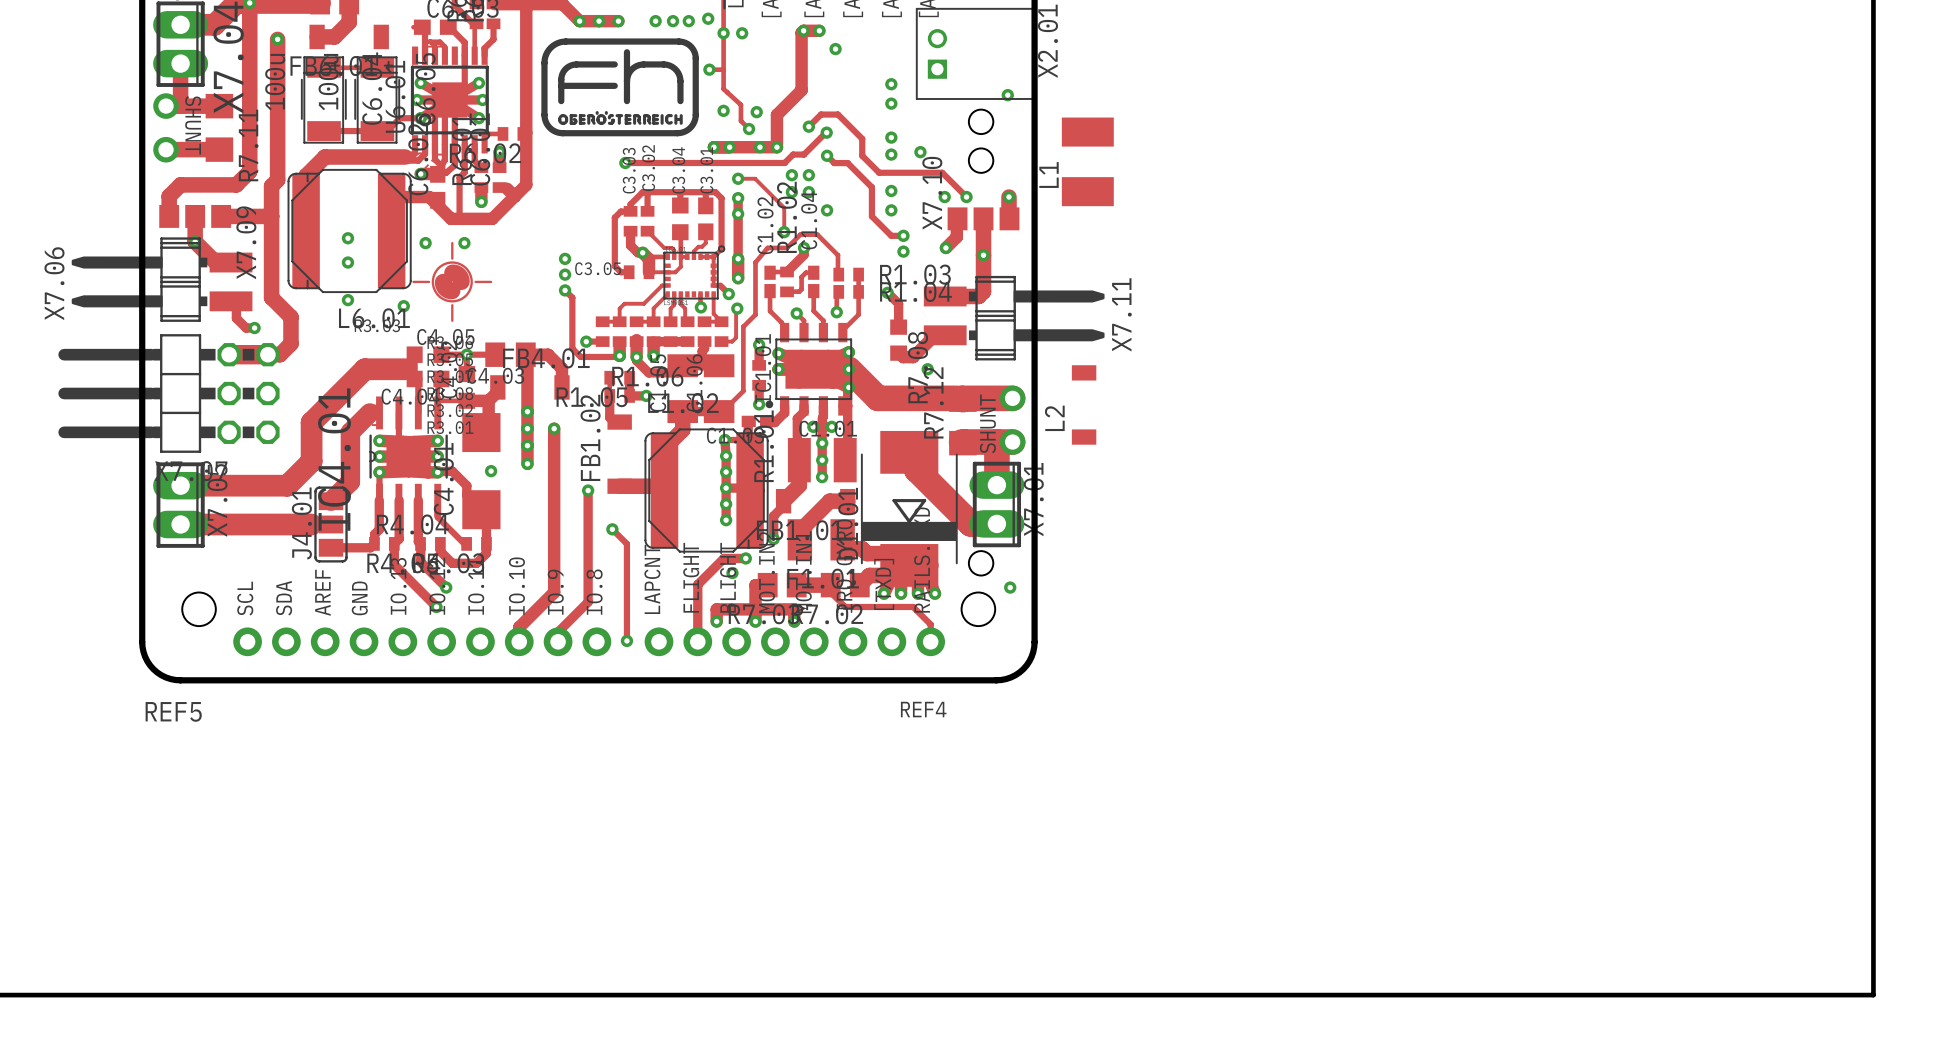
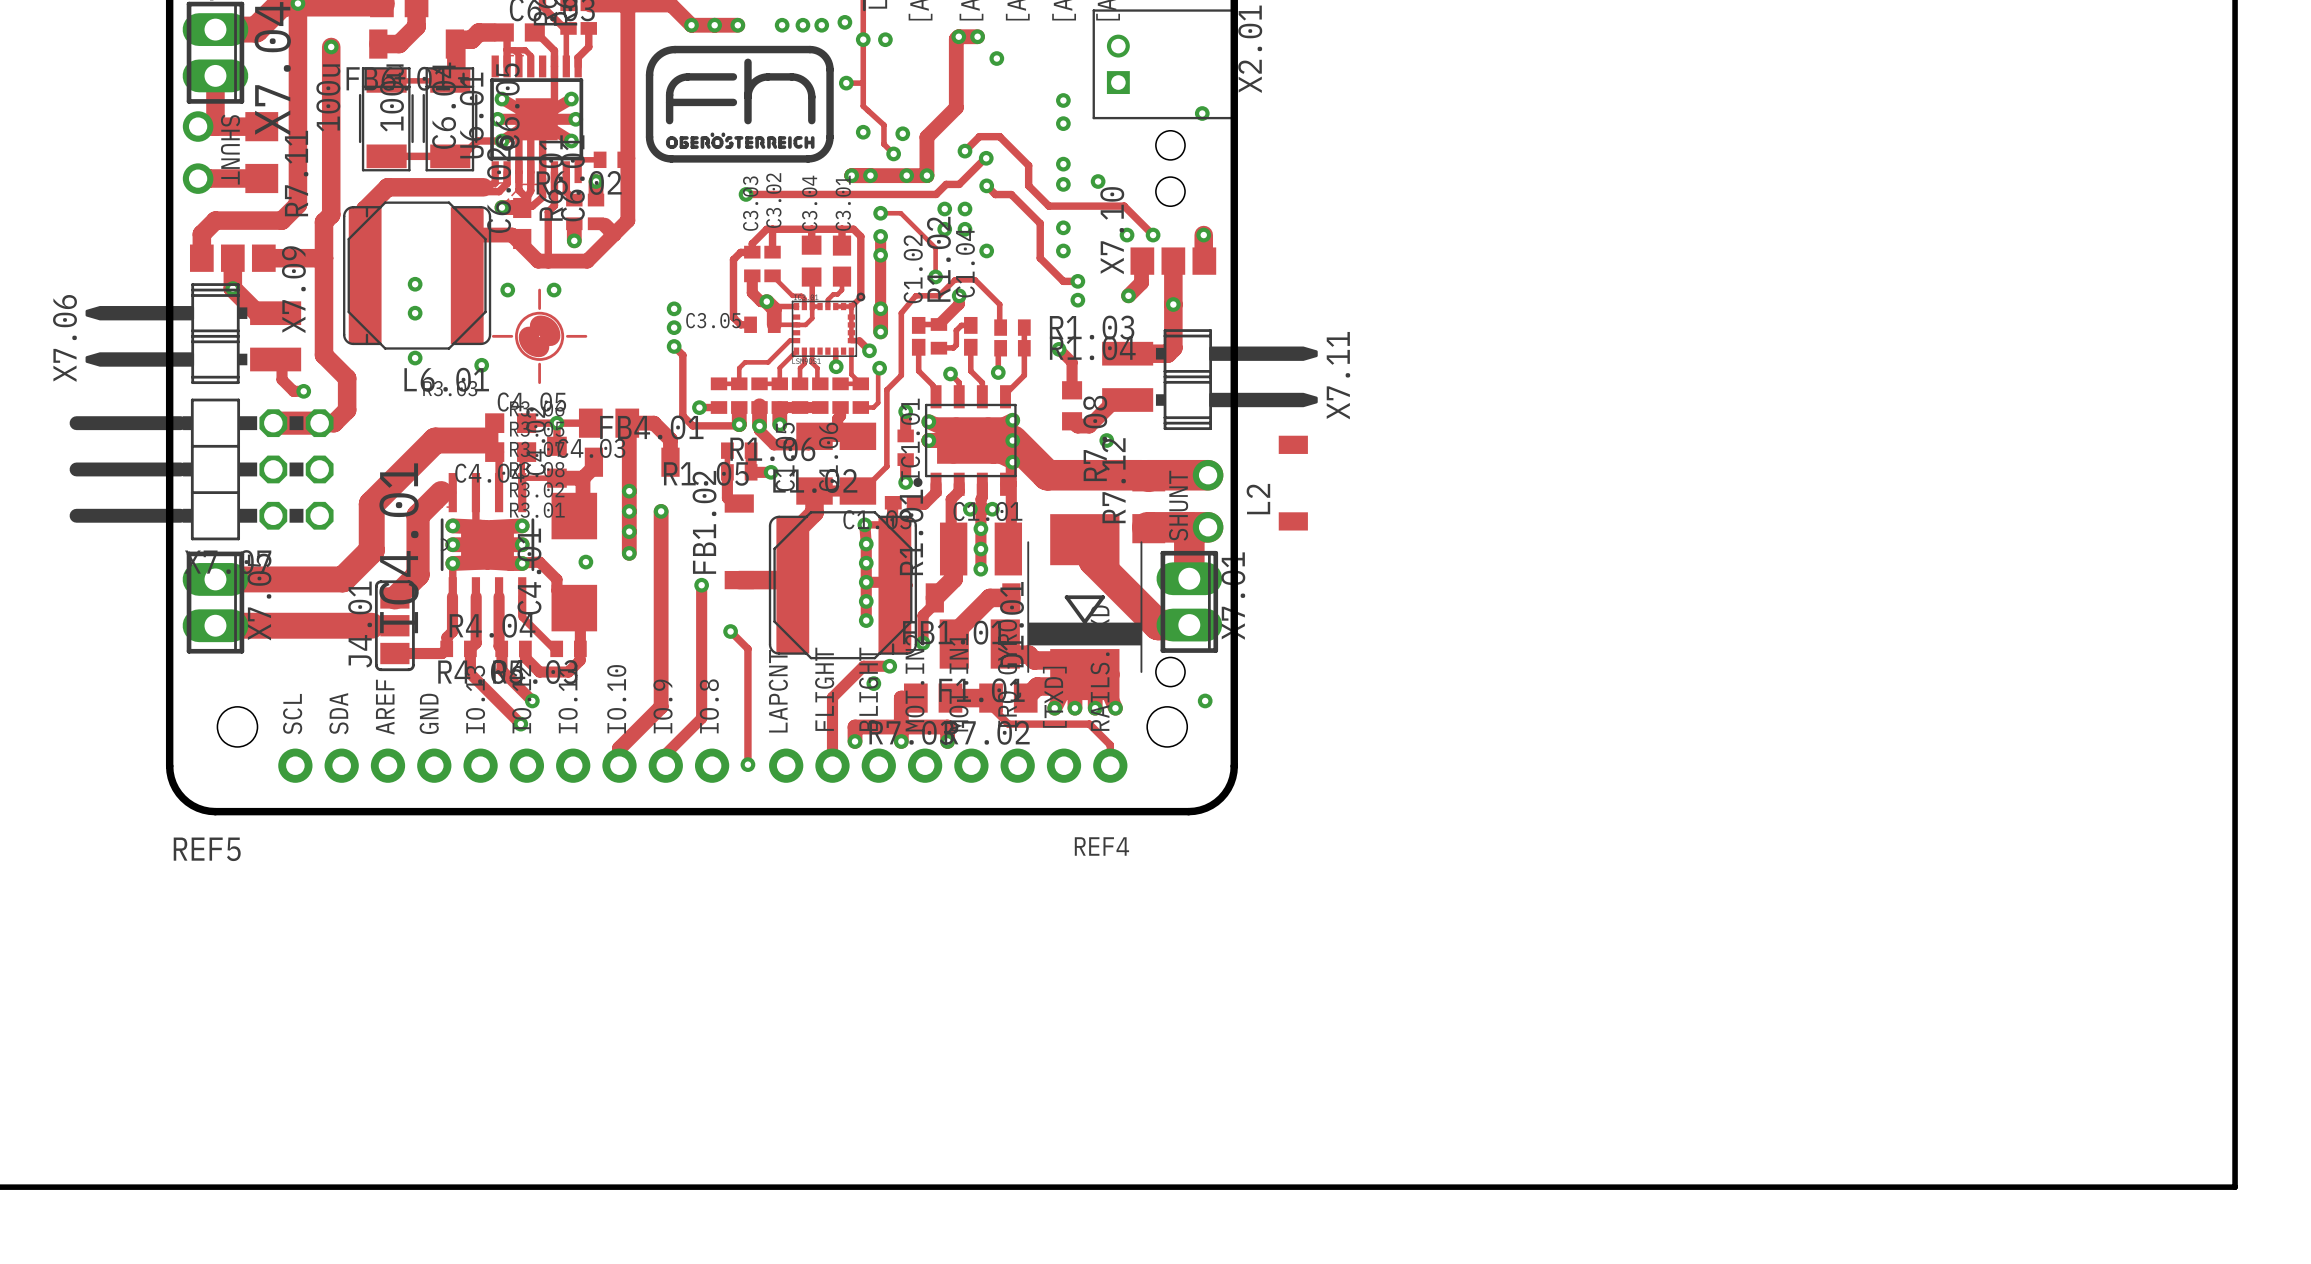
track: none -> (493, 32) (478, 32) (471, 39) (460, 39) (456, 44) (456, 80) (450, 80)
L1: (1087, 161) -> none

